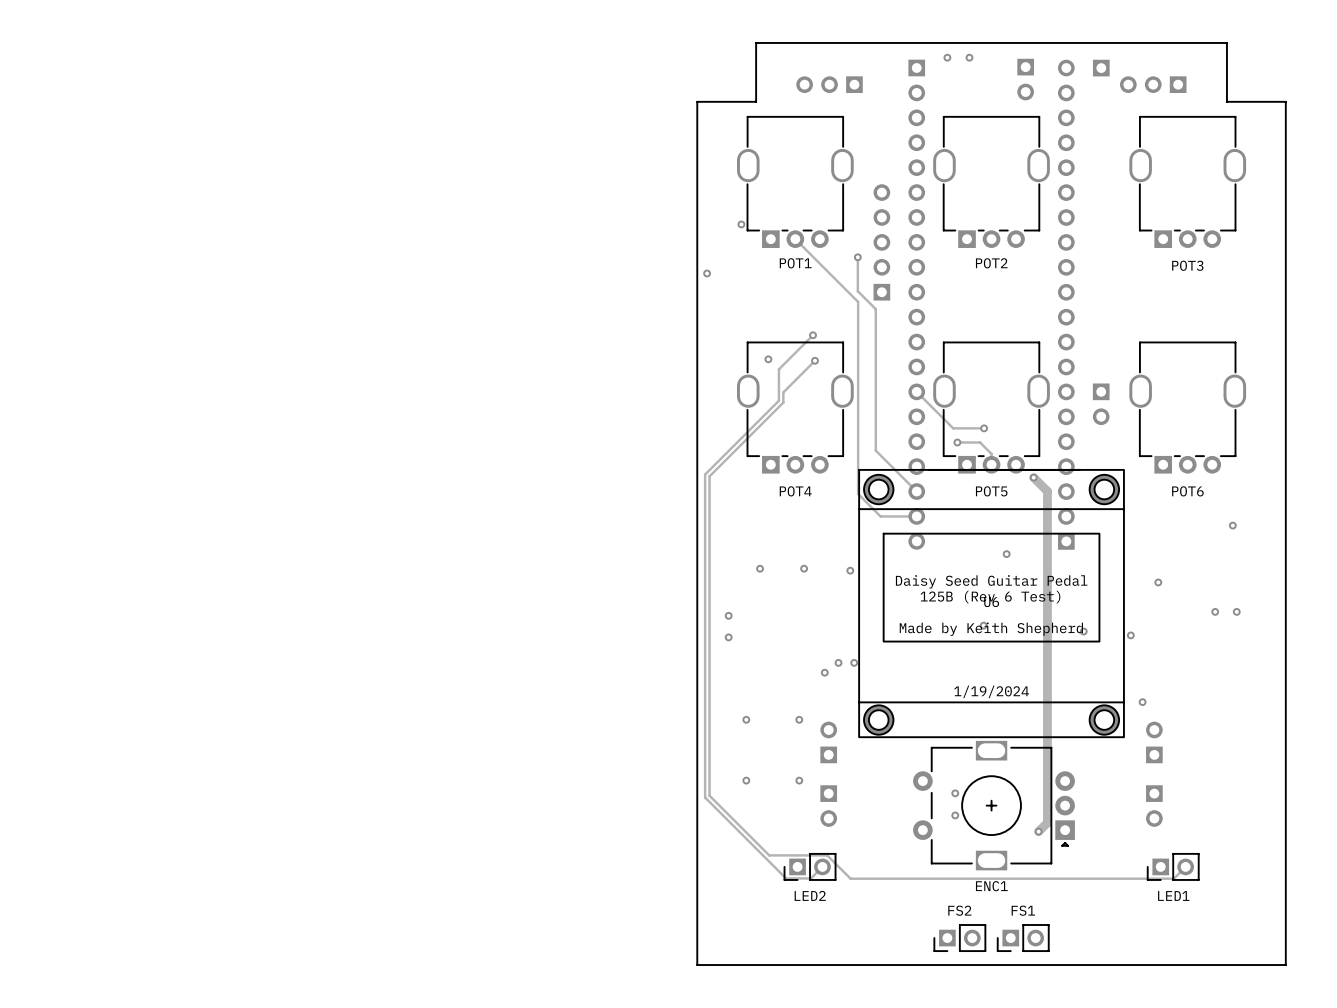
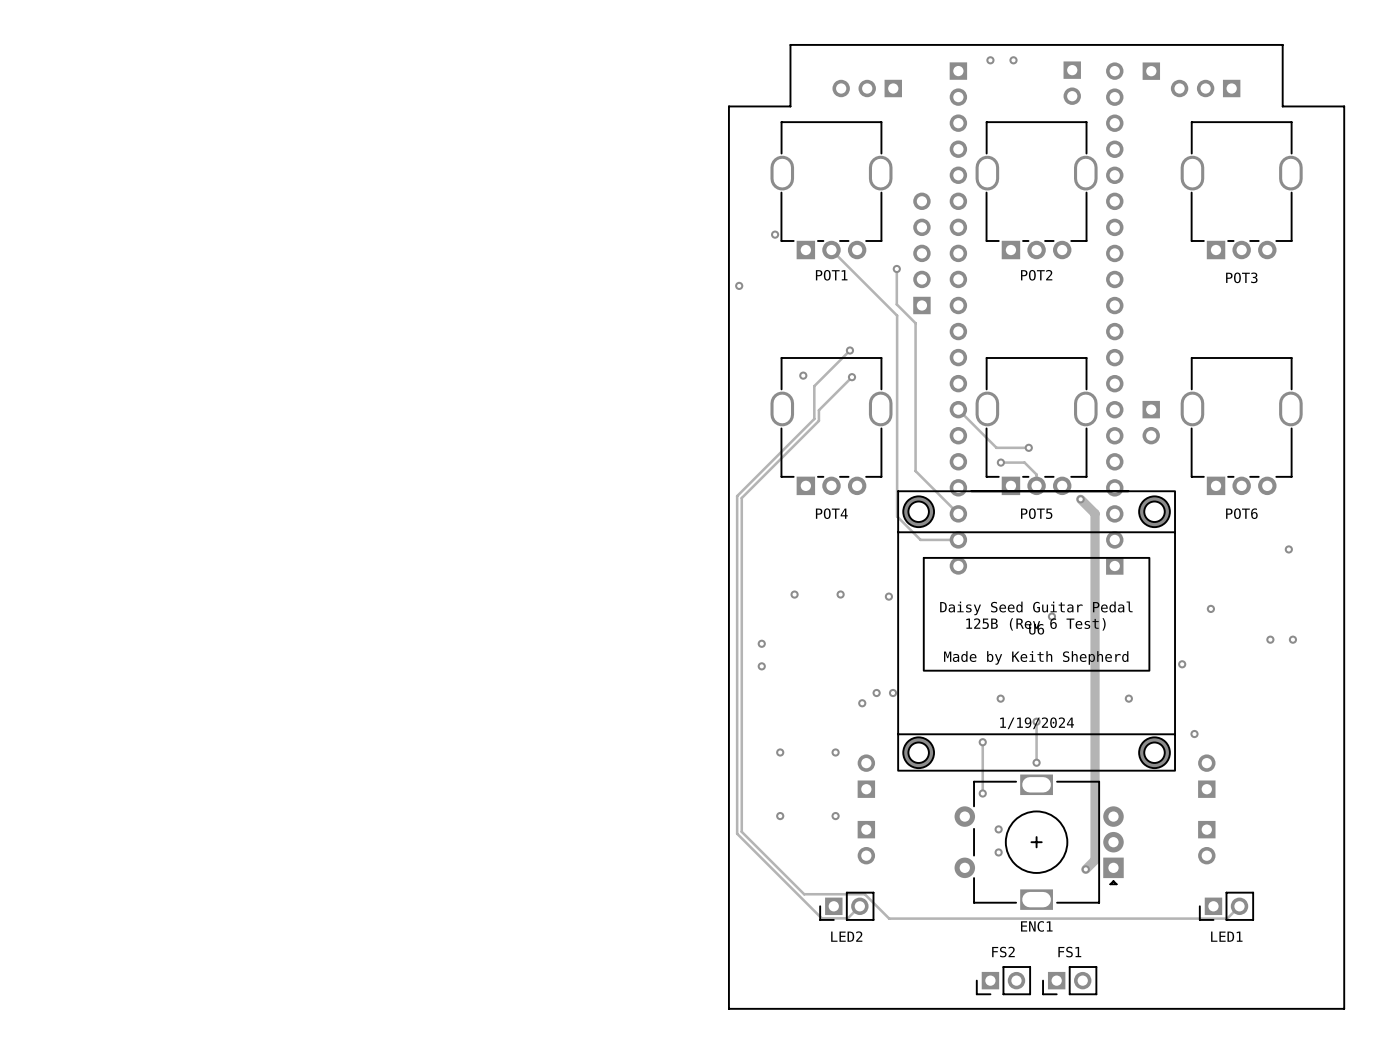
U6 footprint: [858, 469, 1125, 738] -> [897, 490, 1176, 772]
via: (1006, 554) -> none
via: none -> (1051, 616)
via: (983, 625) -> none
via position: (1083, 631) -> (1128, 698)
via: none -> (1000, 698)
track: none -> (1036, 721) (1036, 762)
via: none -> (1036, 721)
track: none -> (982, 742) (982, 793)
via: none -> (982, 742)
via: none -> (1036, 762)
via: none -> (982, 793)

